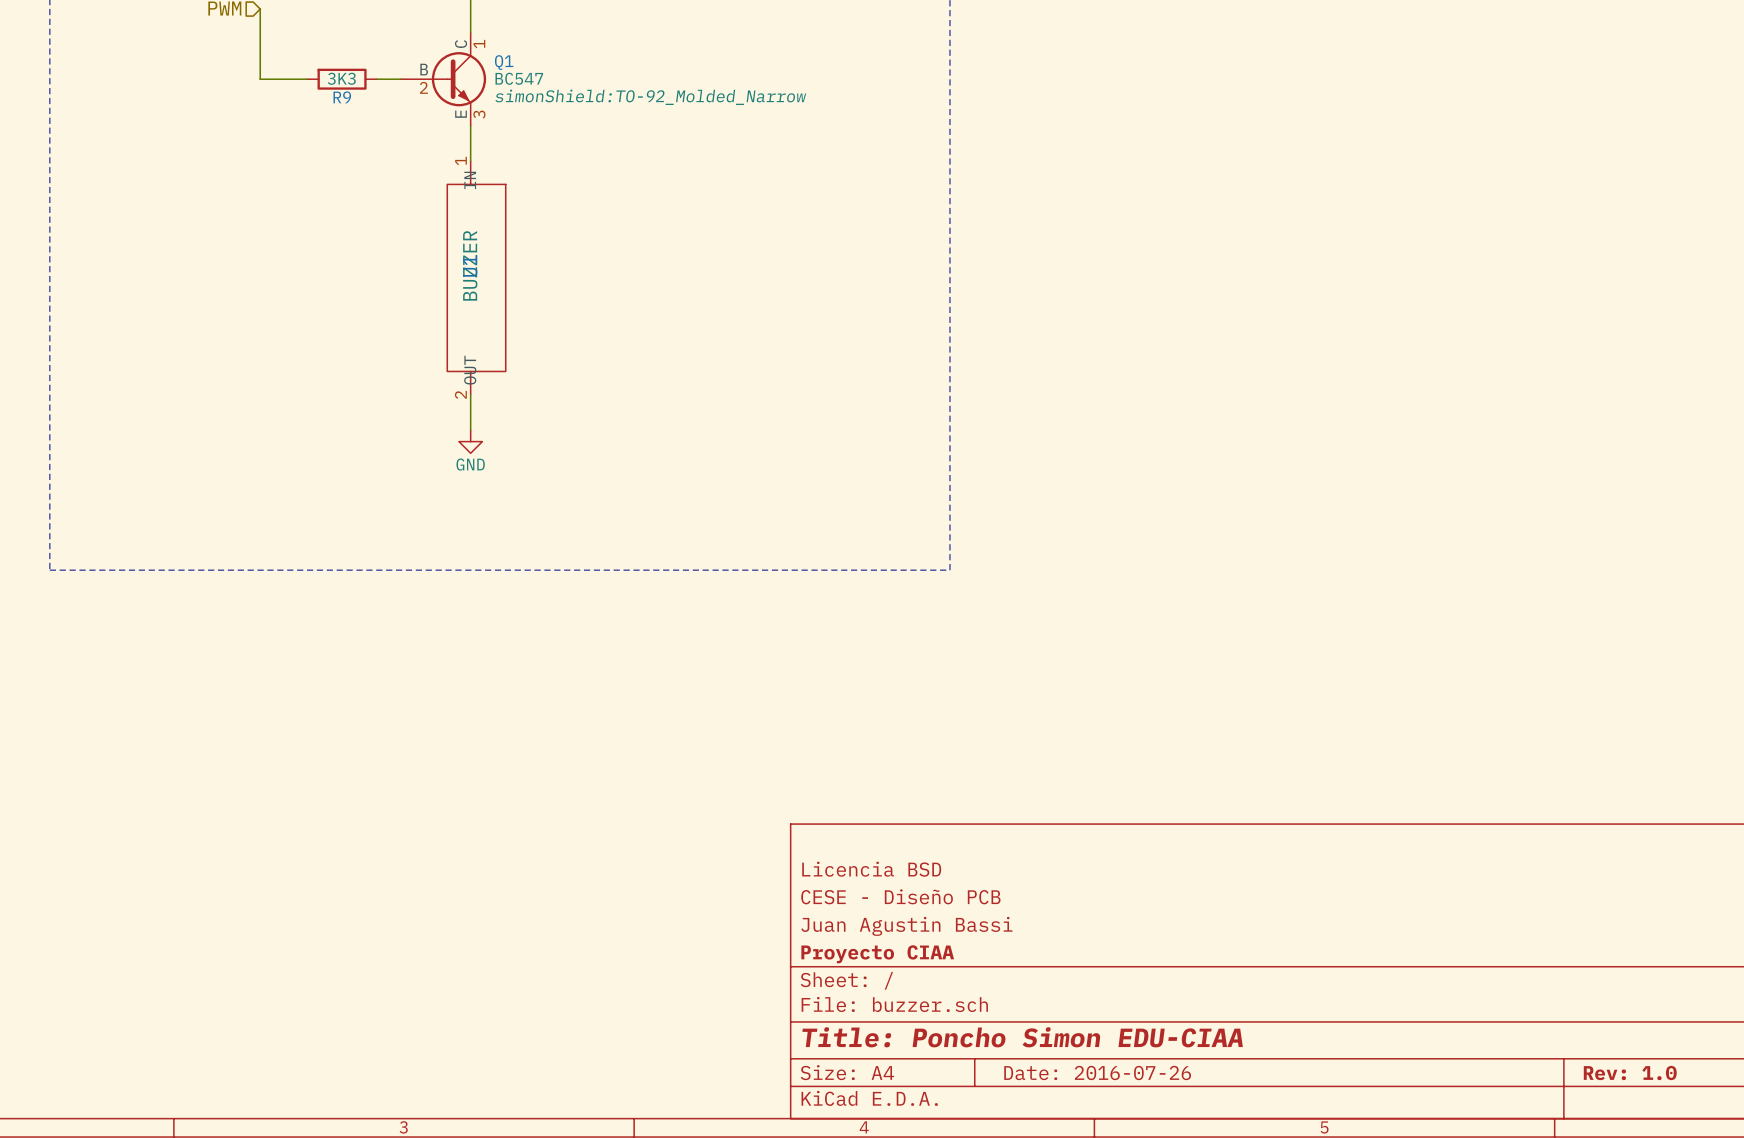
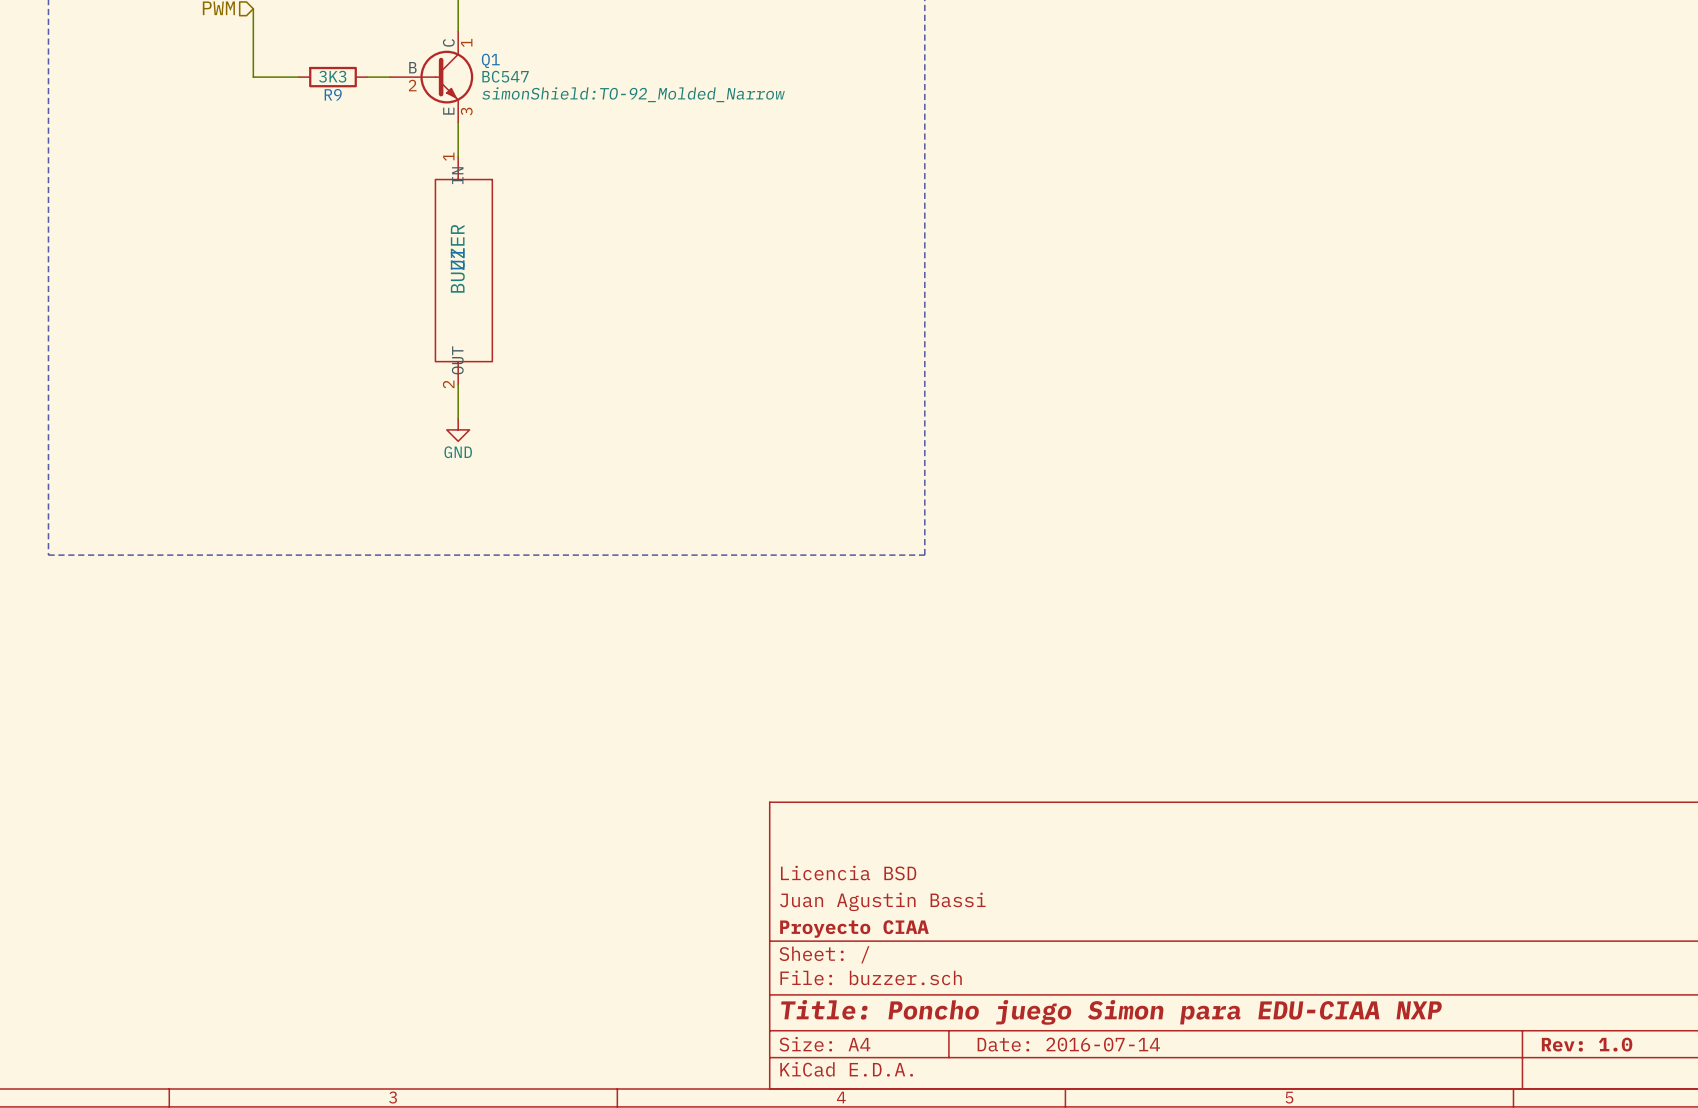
title block: Licencia BSD (871, 869) -> none
title block: CESE - Diseño PCB (900, 896) -> Licencia BSD (848, 873)
title block: Title: Poncho Simon EDU-CIAA (1022, 1037) -> Title: Poncho juego Simon para EDU-CIAA NXP (1111, 1012)
title block: Date: 2016-07-26 (1097, 1073) -> Date: 2016-07-14 (1068, 1044)

